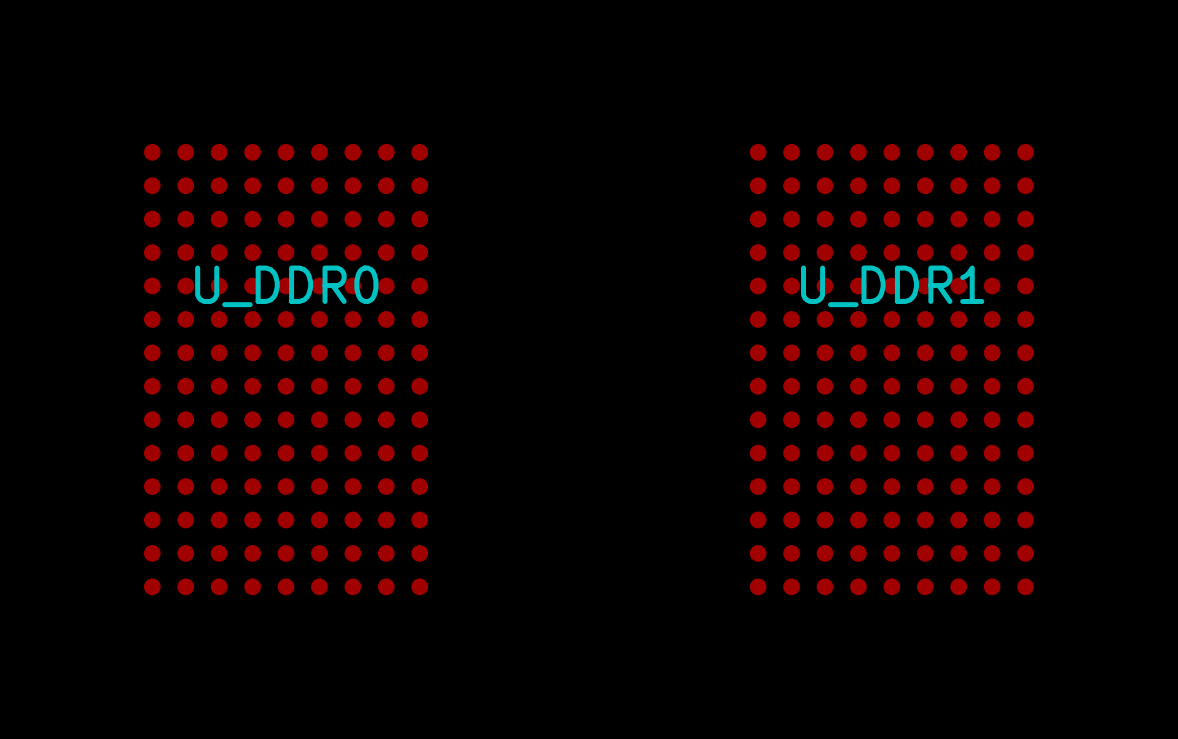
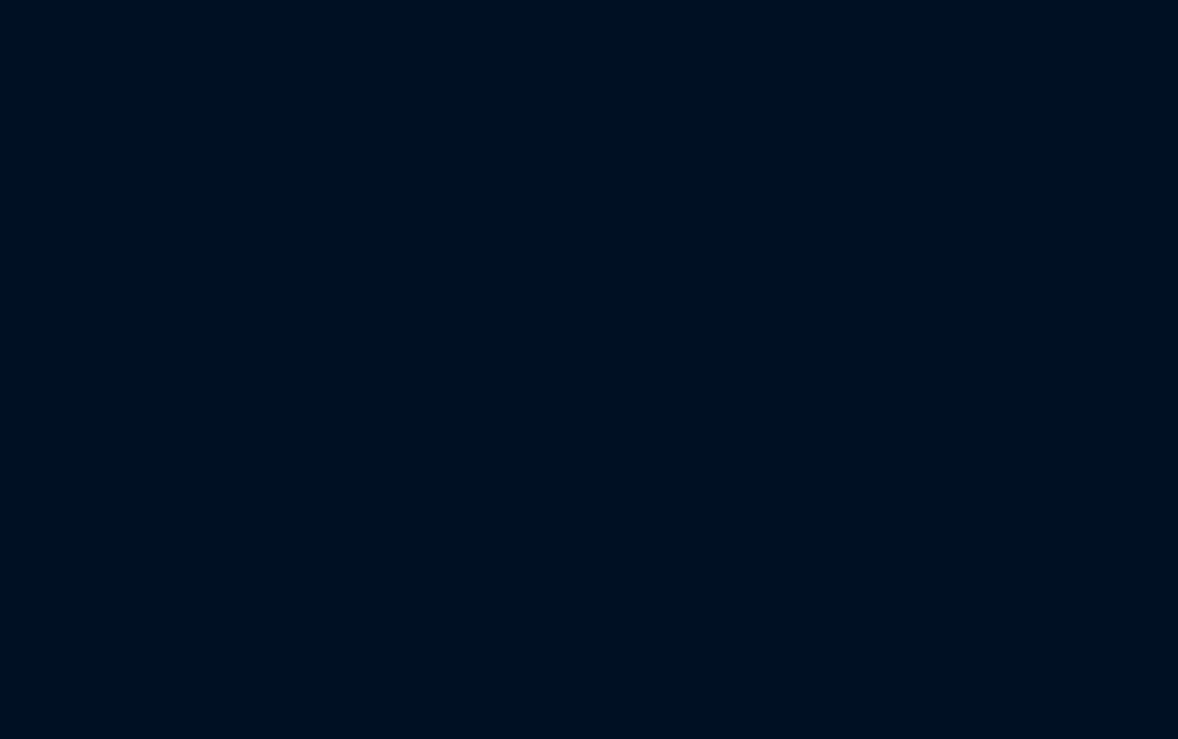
U_DDR0: (286, 369) -> none
U_DDR1: (891, 369) -> none

